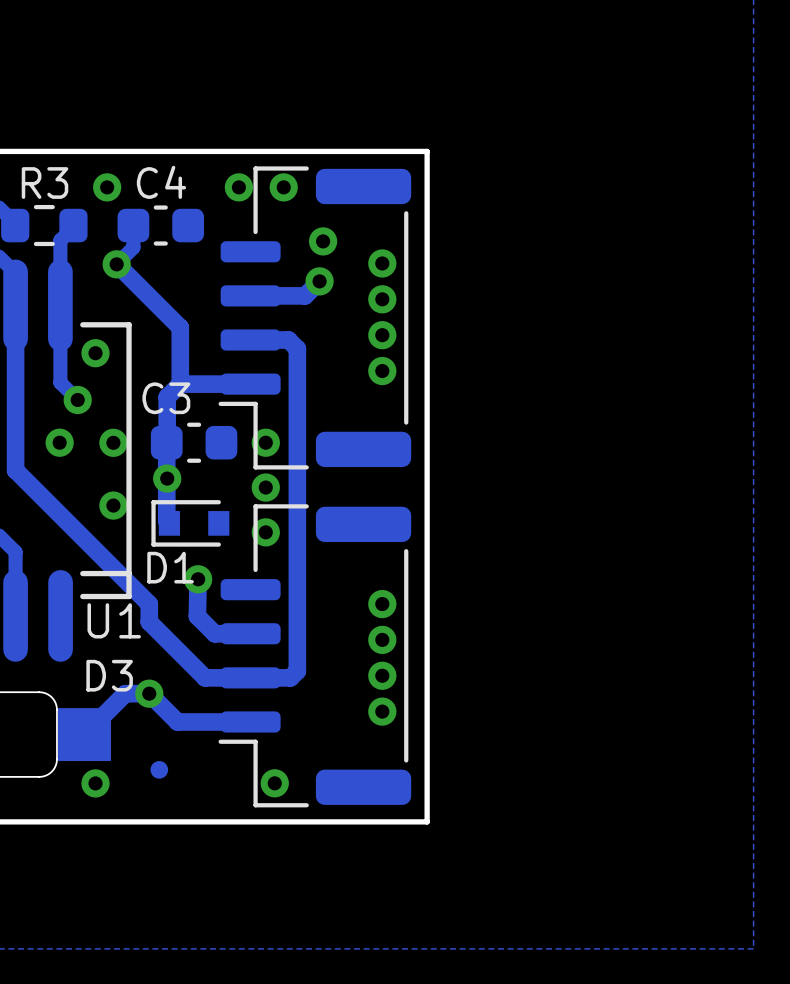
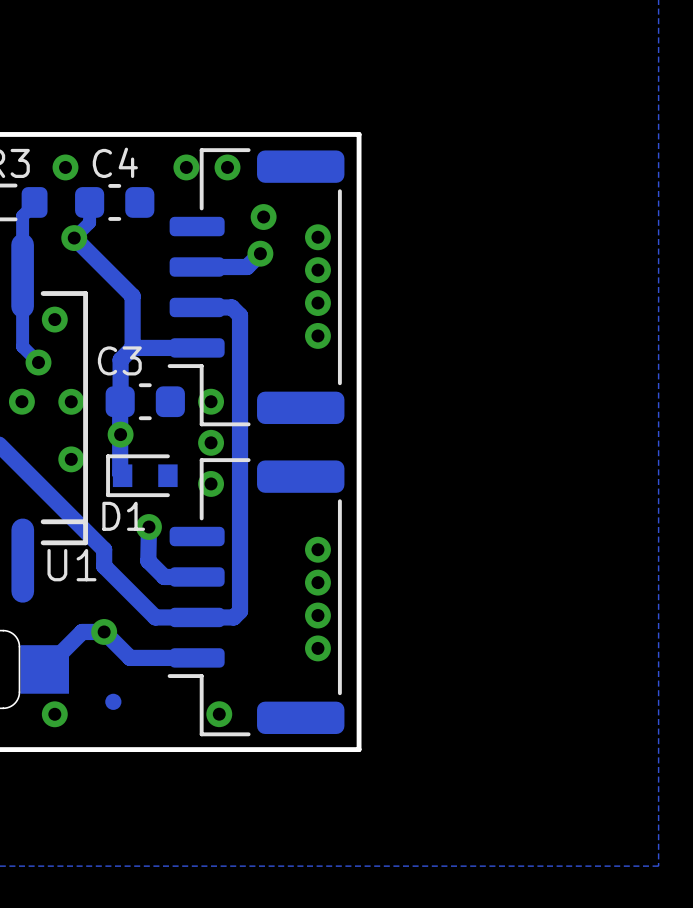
D3 name: D3 (109, 675) -> none

